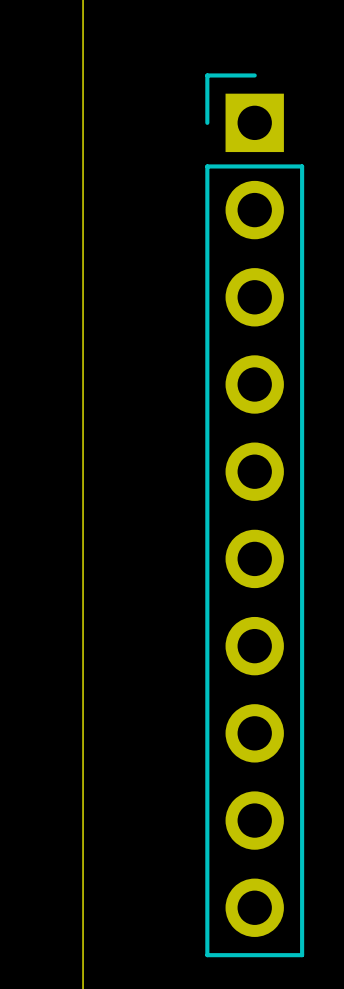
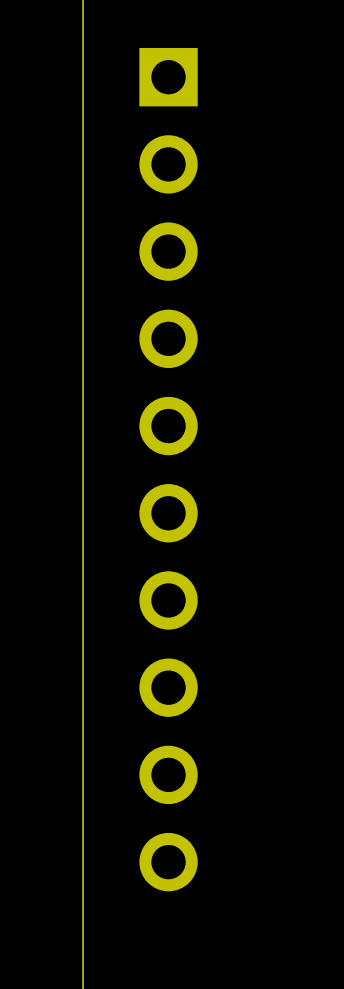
part side: bottom (254, 515) -> top (168, 469)

